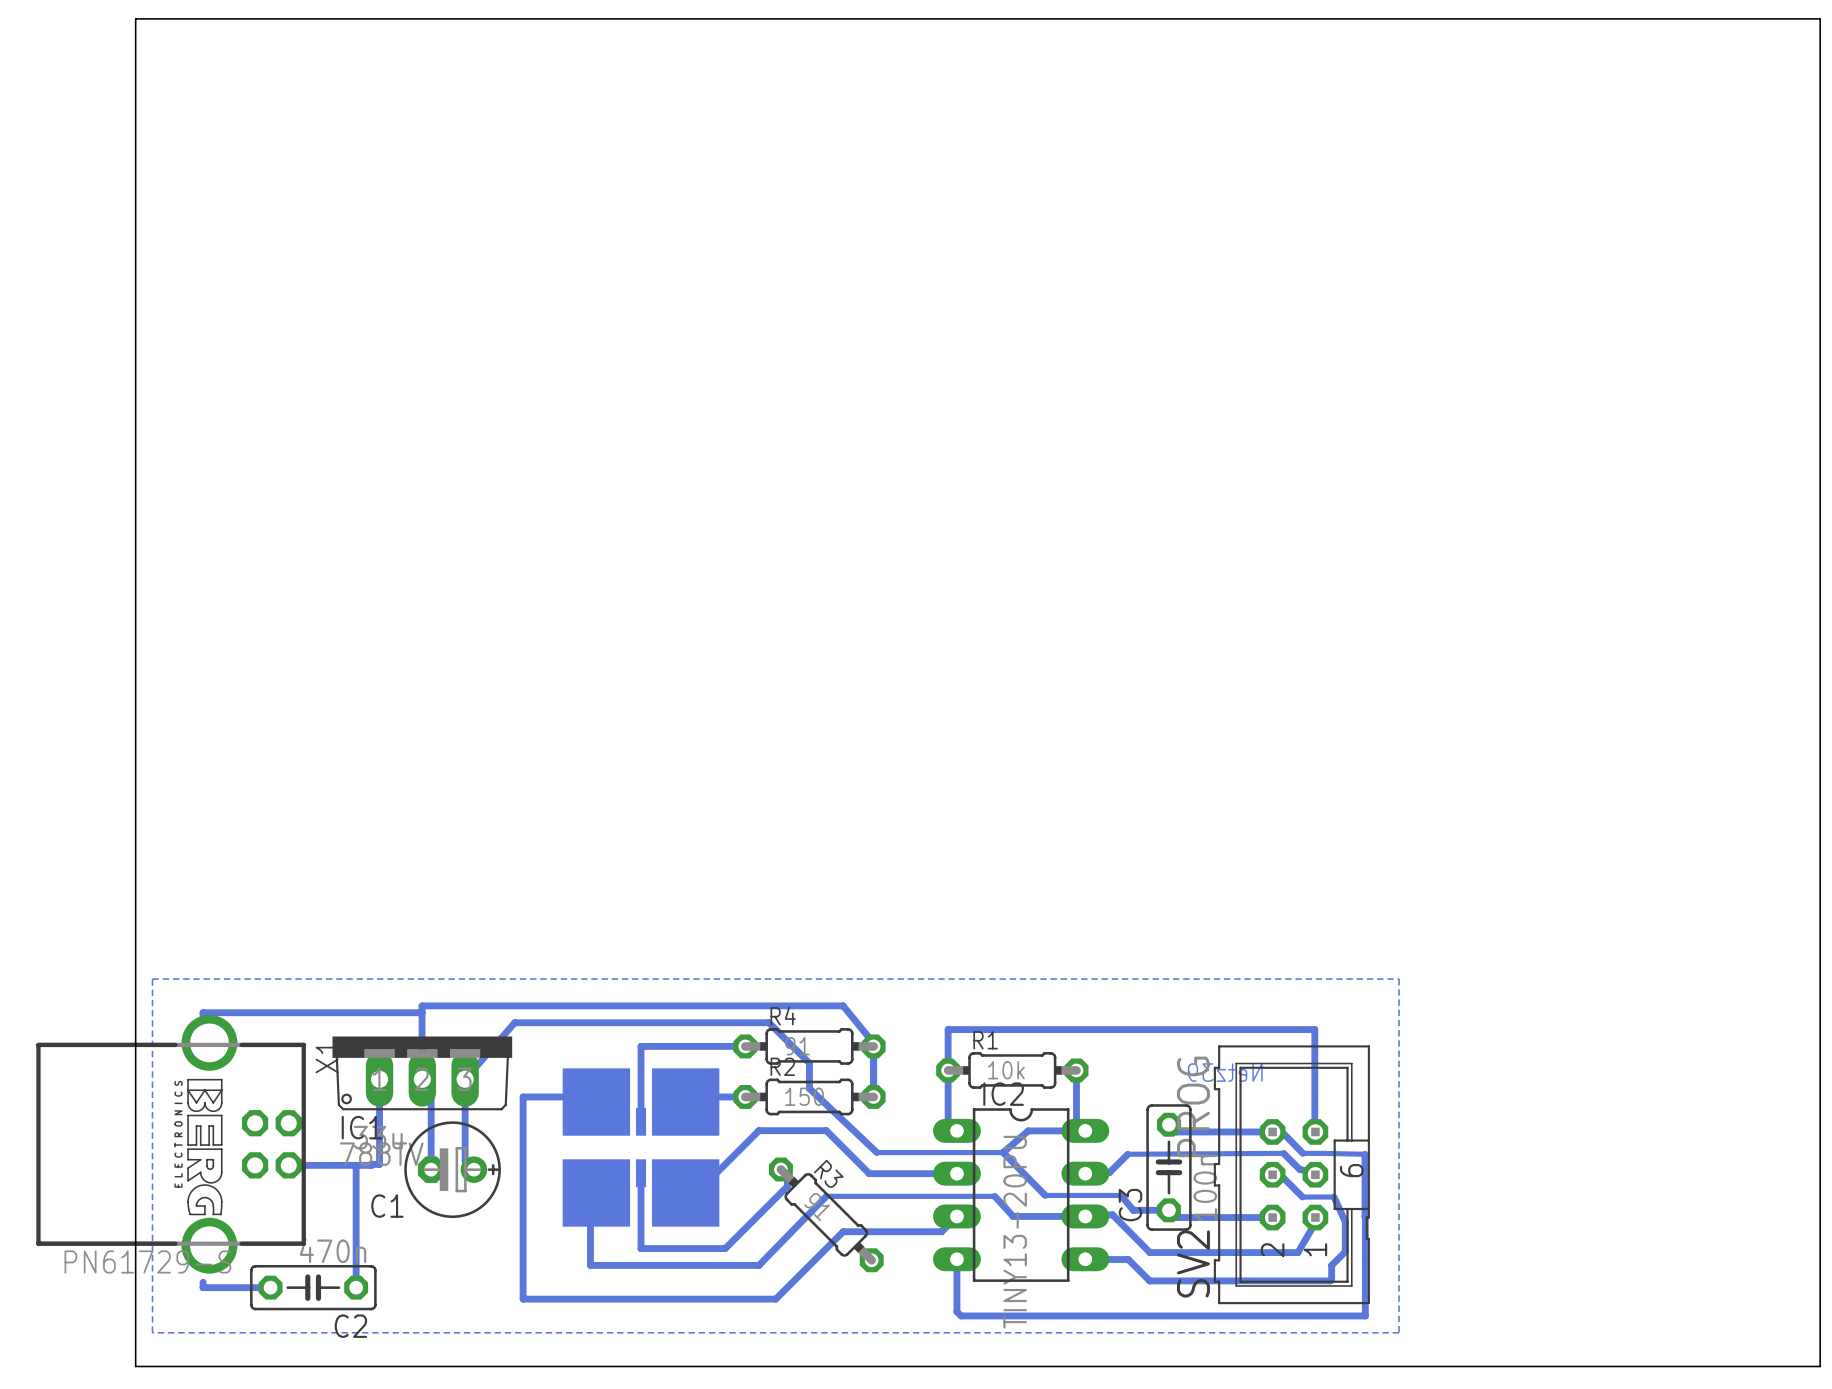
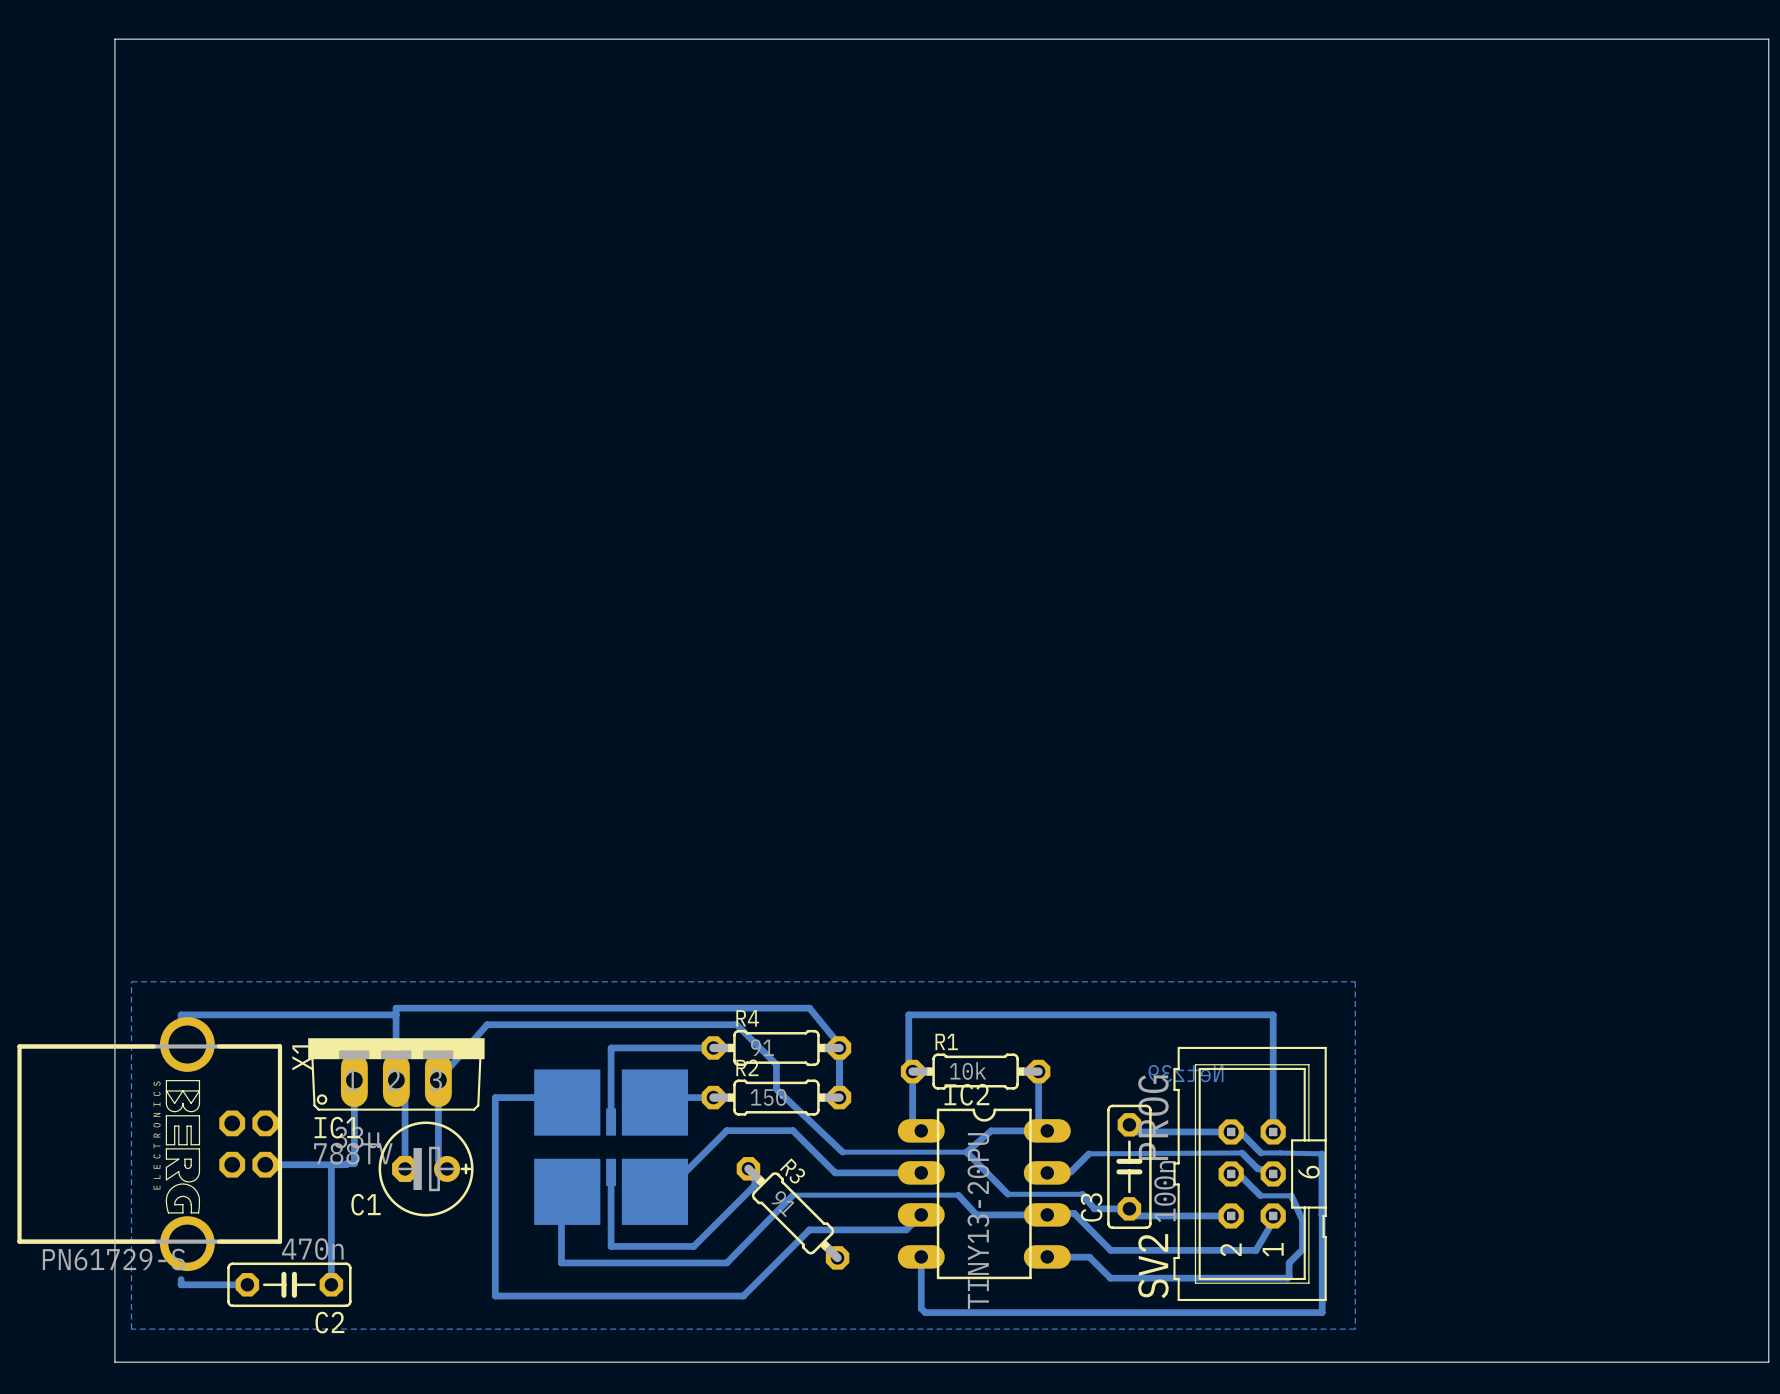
bottom track: (948, 1070) (948, 1029) (1314, 1029) (1314, 1131) -> (912, 1071) (908, 1071) (908, 1014) (1273, 1014) (1273, 1131)

